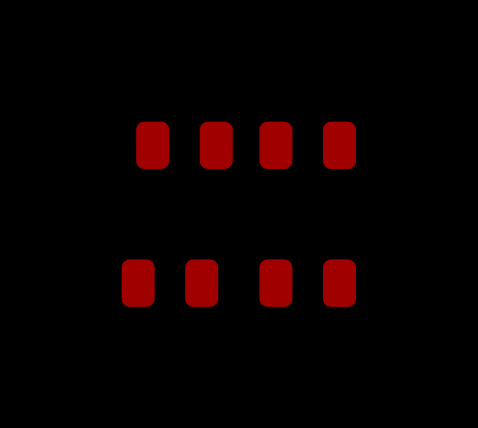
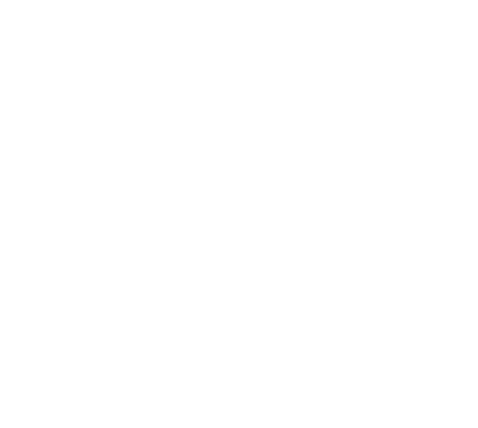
part: (184, 145) -> none
part: (307, 145) -> none
part: (169, 283) -> none
part: (307, 283) -> none

